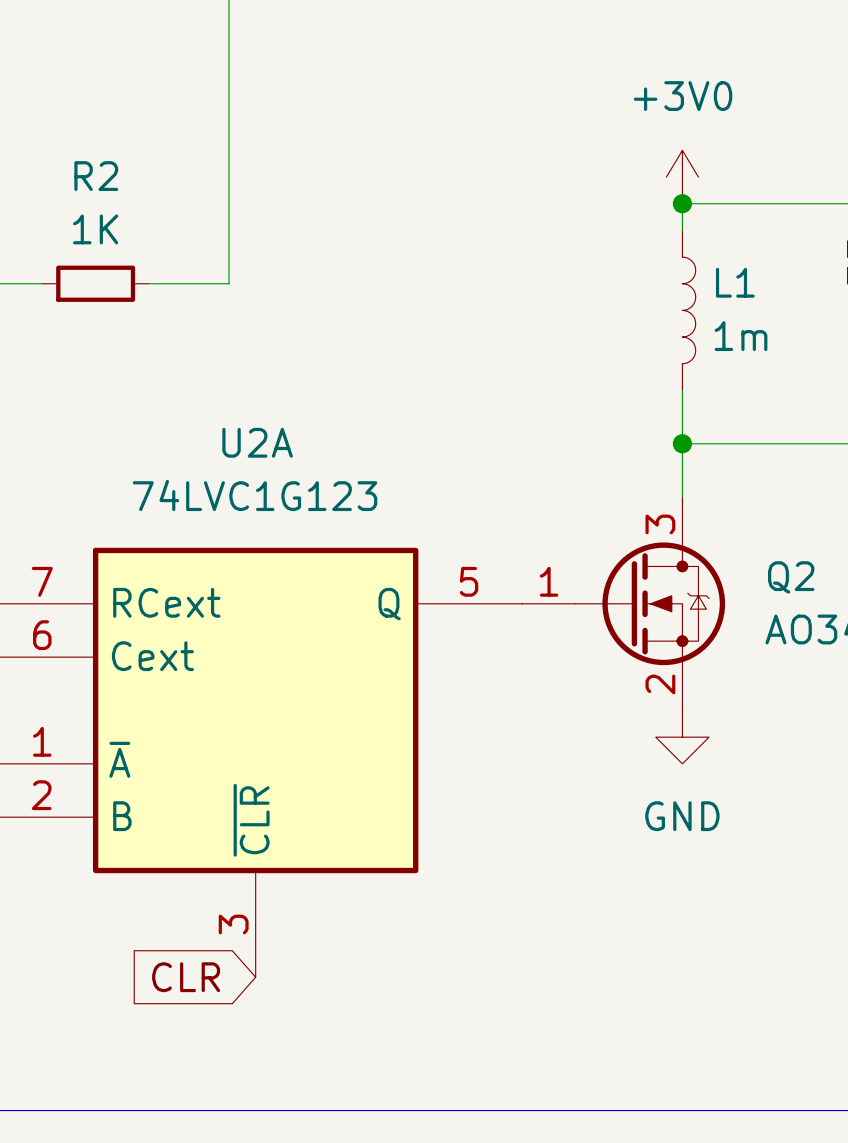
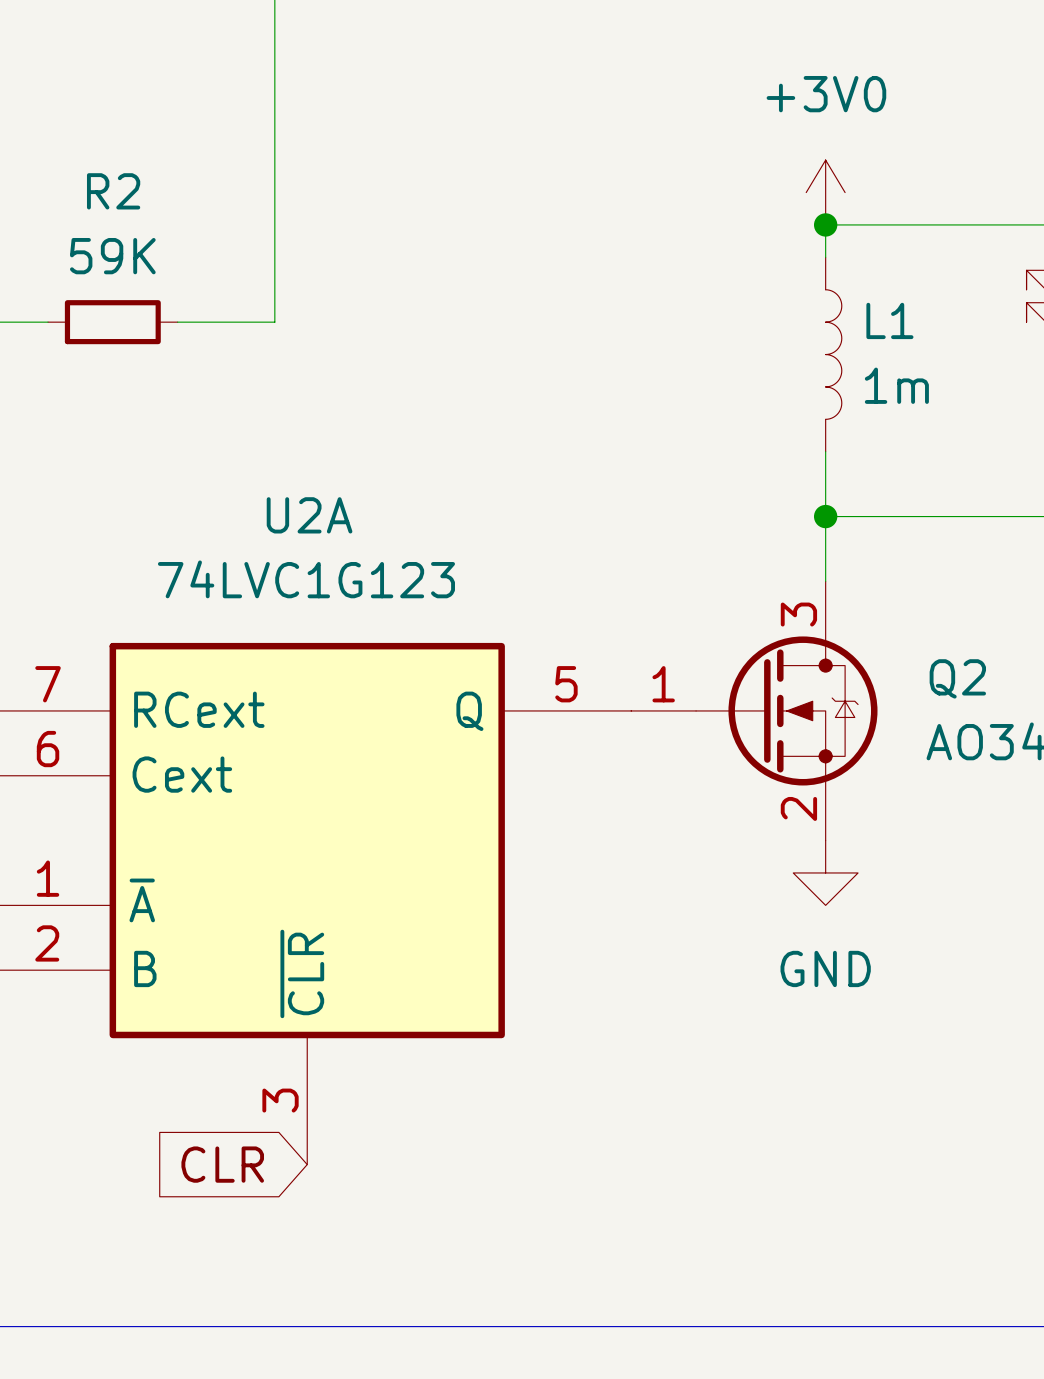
R2 value: 1K (95, 229) -> 59K (112, 256)

